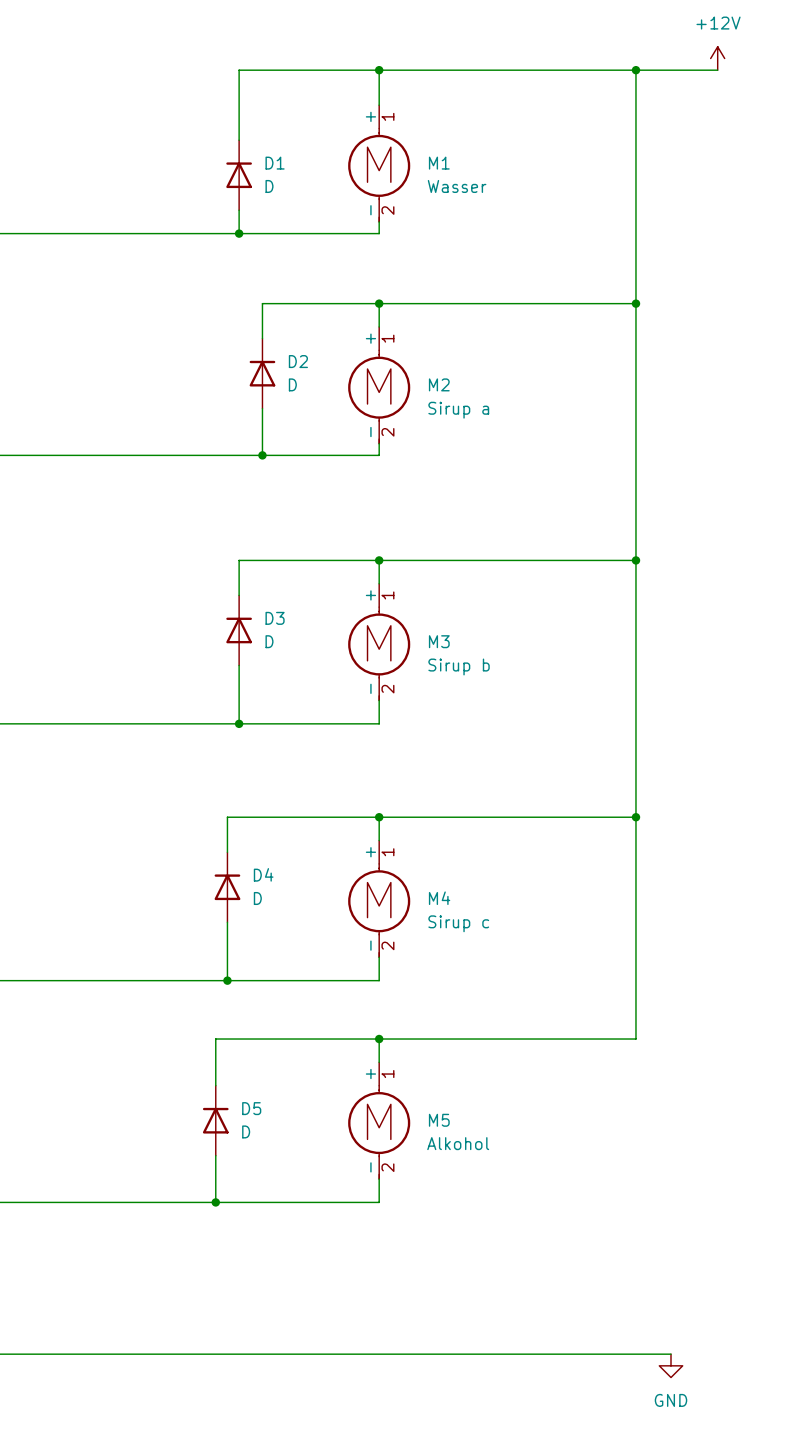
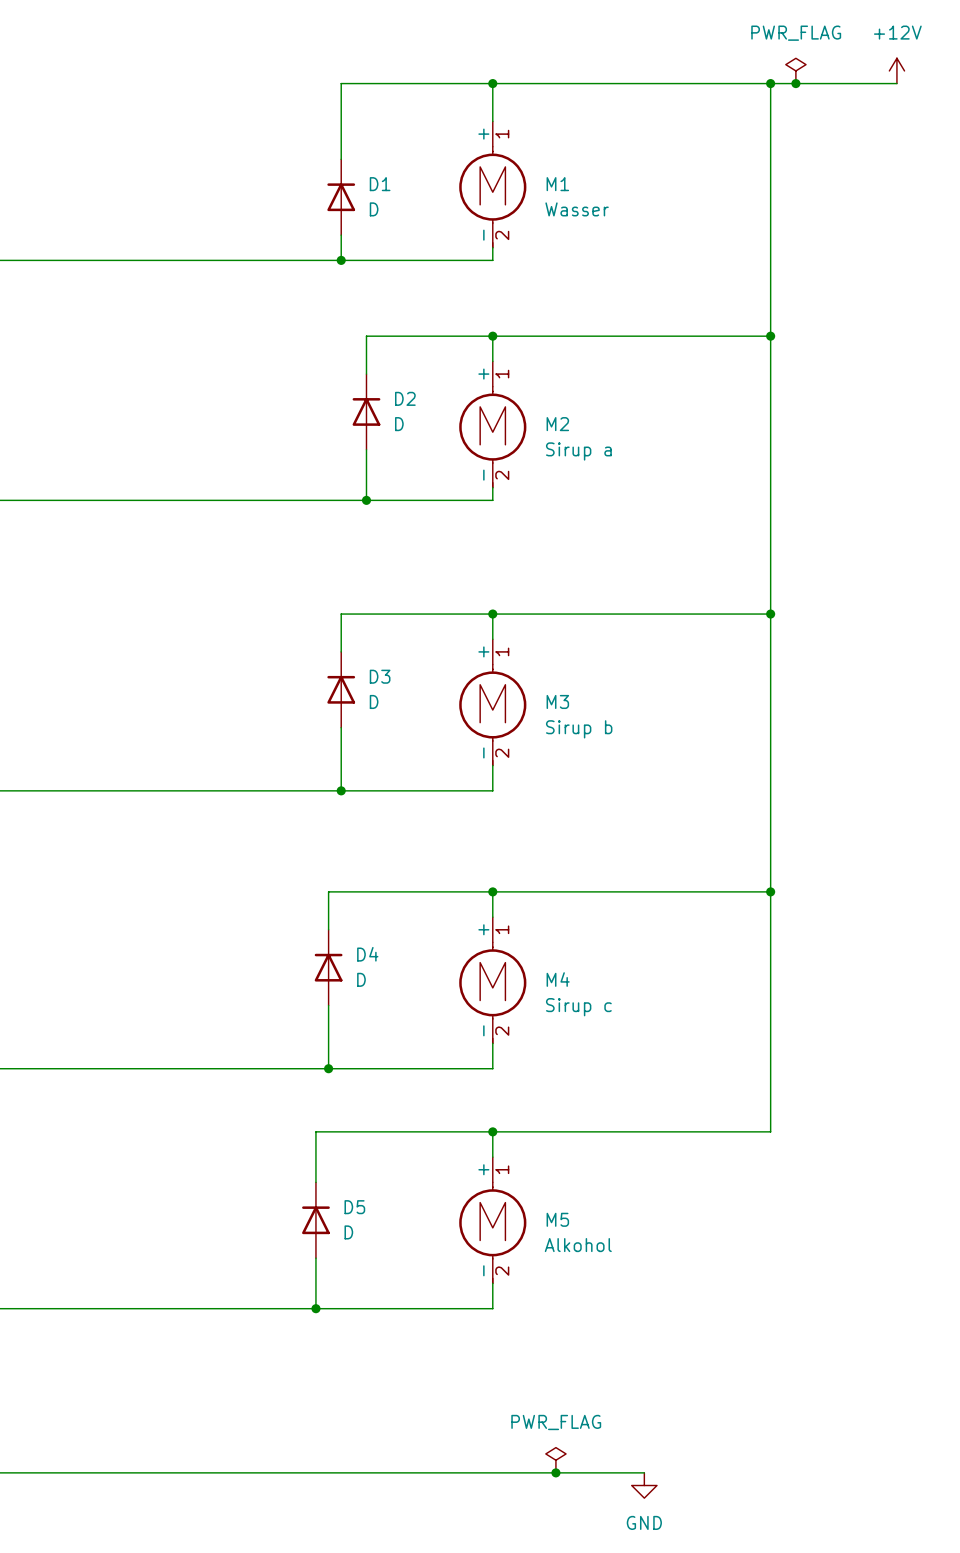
power symbol: none -> PWR_FLAG (795, 70)
power symbol position: +12V (717, 58) -> +12V (896, 70)
junction: none -> (795, 83)
wire: none -> (859, 83) (896, 83)
power symbol: none -> PWR_FLAG (555, 1460)
junction: none -> (555, 1472)
wire: (519, 1354) (671, 1354) -> none
power symbol position: GND (671, 1365) -> GND (644, 1485)

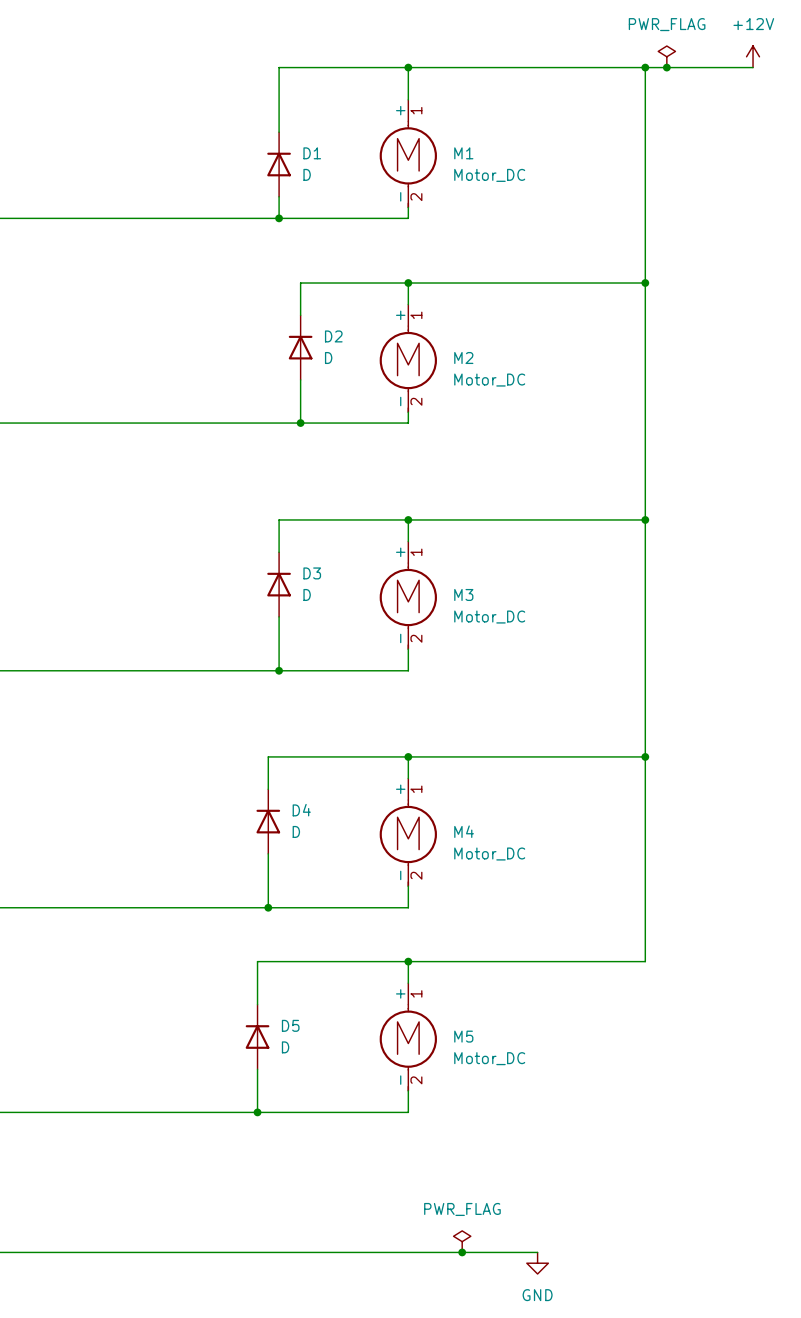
M1 value: Wasser (577, 209) -> Motor_DC (489, 175)
M2 value: Sirup a (578, 451) -> Motor_DC (489, 380)
M3 value: Sirup b (579, 729) -> Motor_DC (489, 617)
M4 value: Sirup c (578, 1007) -> Motor_DC (489, 854)
M5 value: Alkohol (578, 1245) -> Motor_DC (489, 1058)

